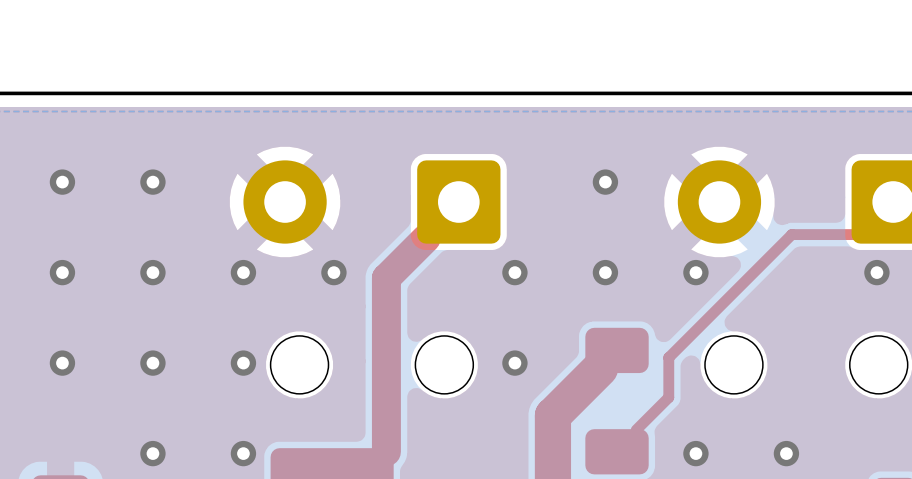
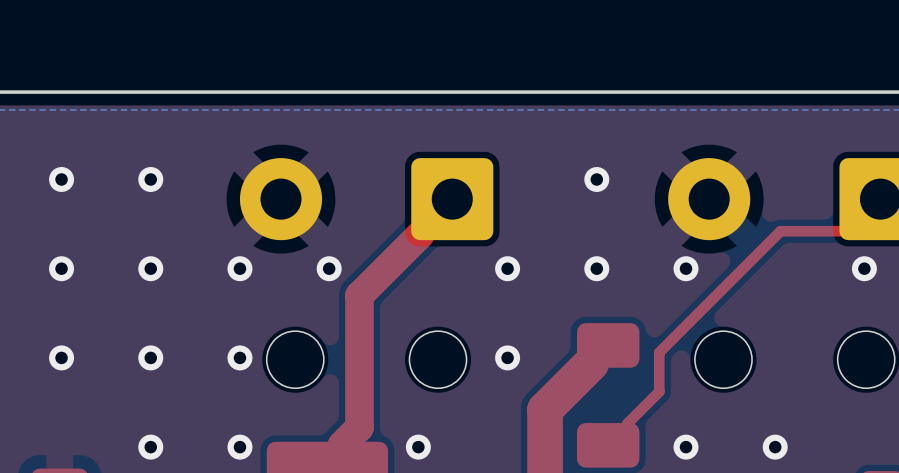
top track: (386, 278) (386, 451) -> (380, 274) (359, 295) (359, 427) (341, 445)
via: none -> (418, 447)

